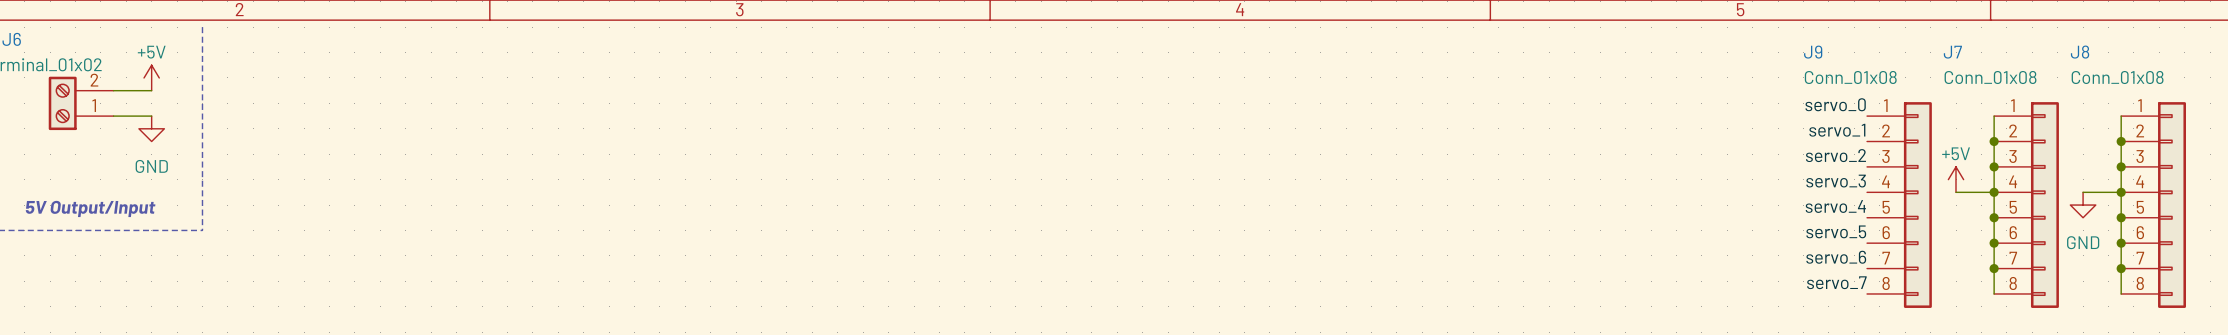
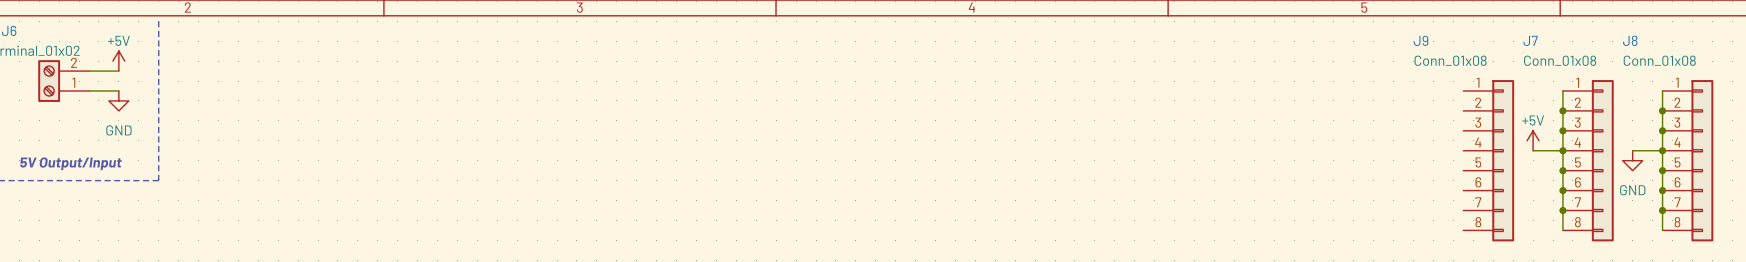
label: servo_0 (1835, 104) -> none
label: servo_1 (1837, 130) -> none
label: servo_2 (1836, 155) -> none
label: servo_3 (1836, 181) -> none
label: servo_4 (1835, 206) -> none
label: servo_5 (1836, 231) -> none
label: servo_6 (1836, 257) -> none
label: servo_7 (1836, 282) -> none

